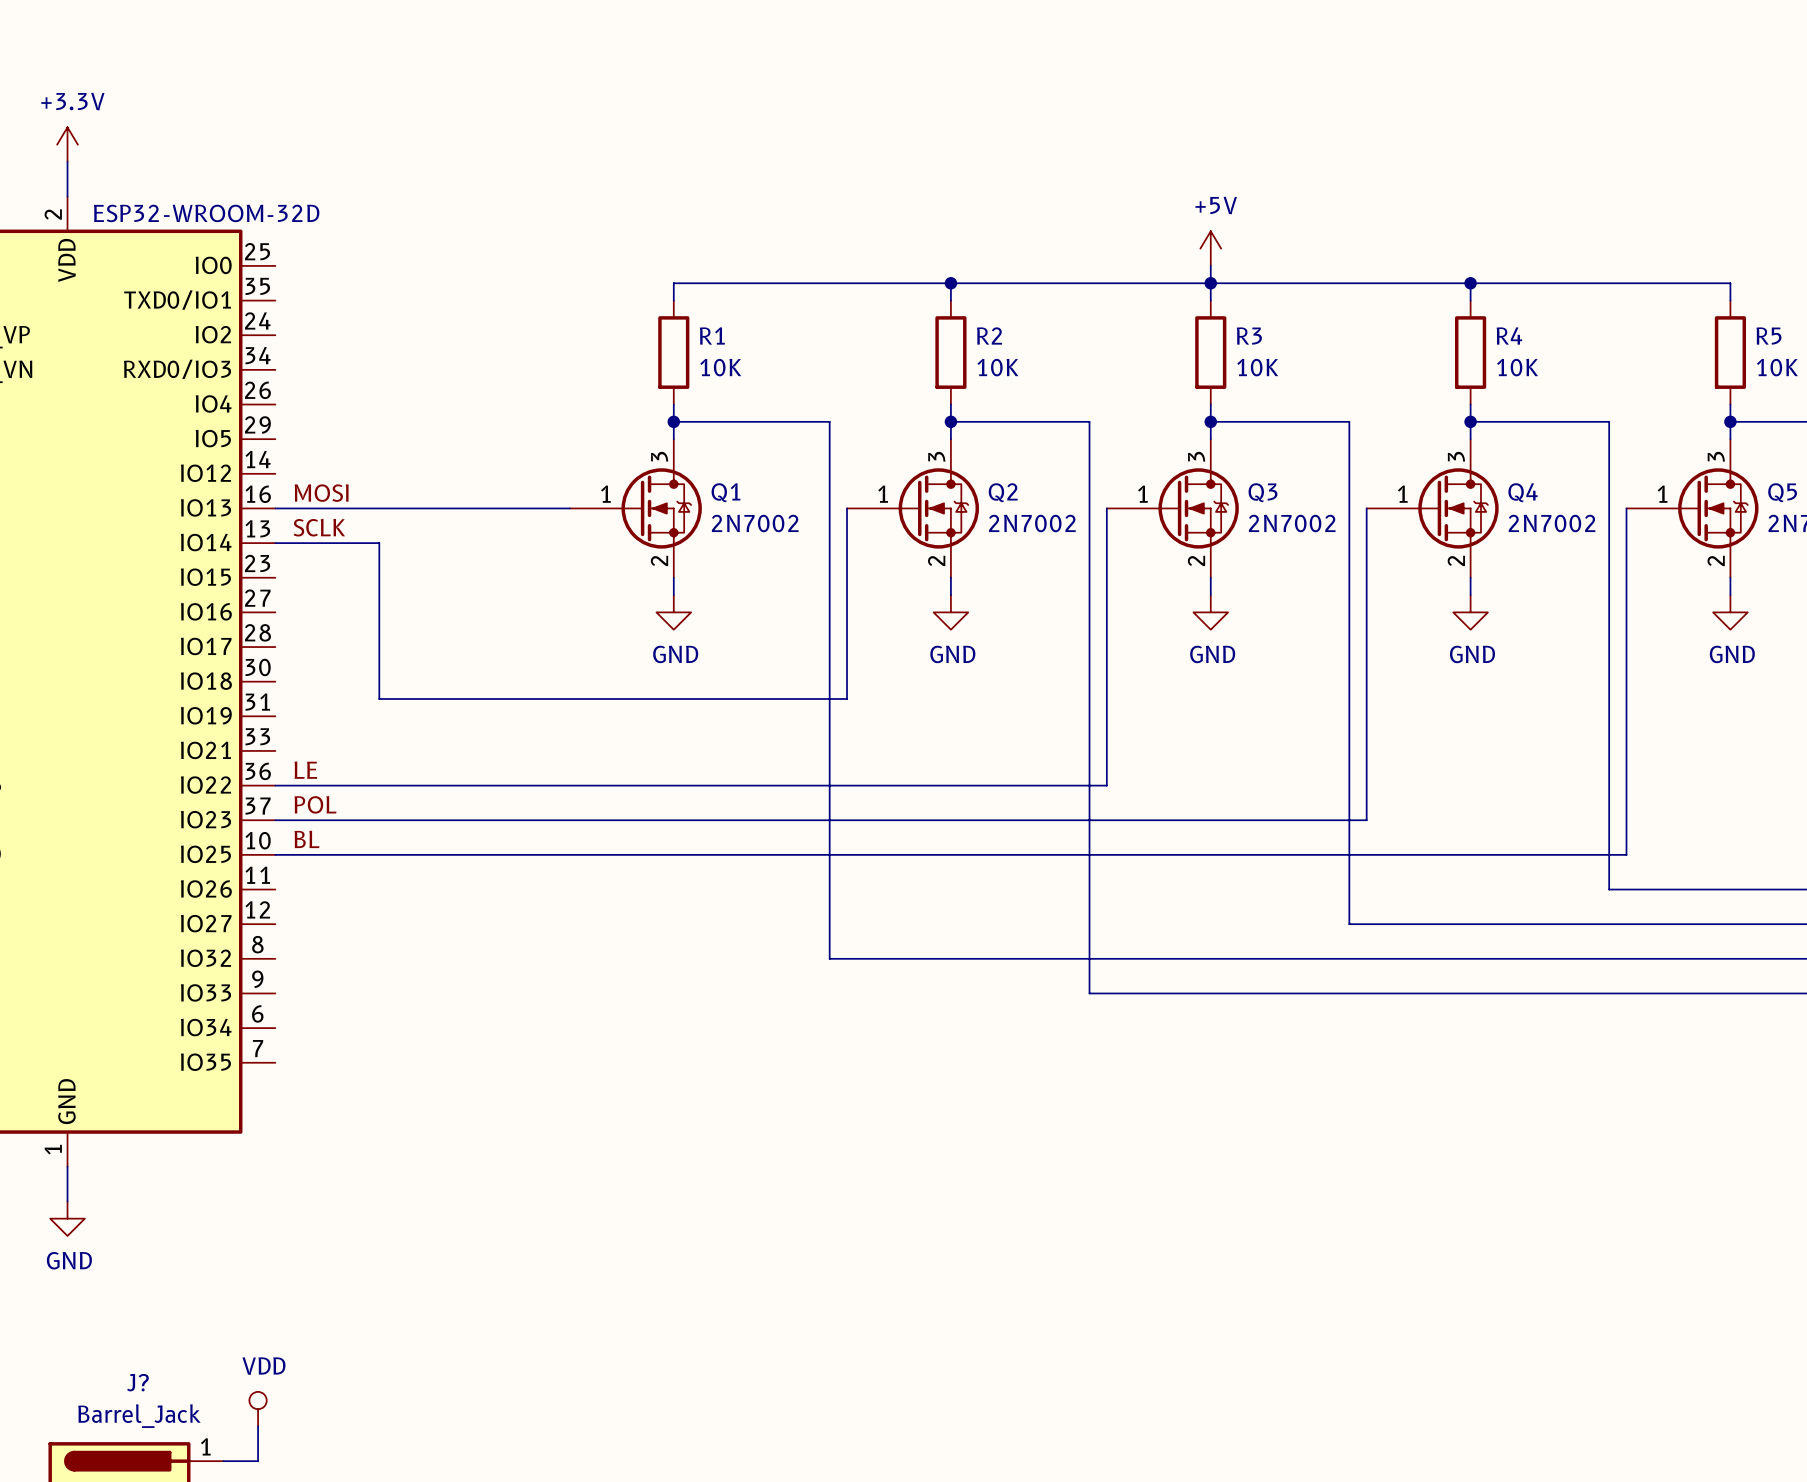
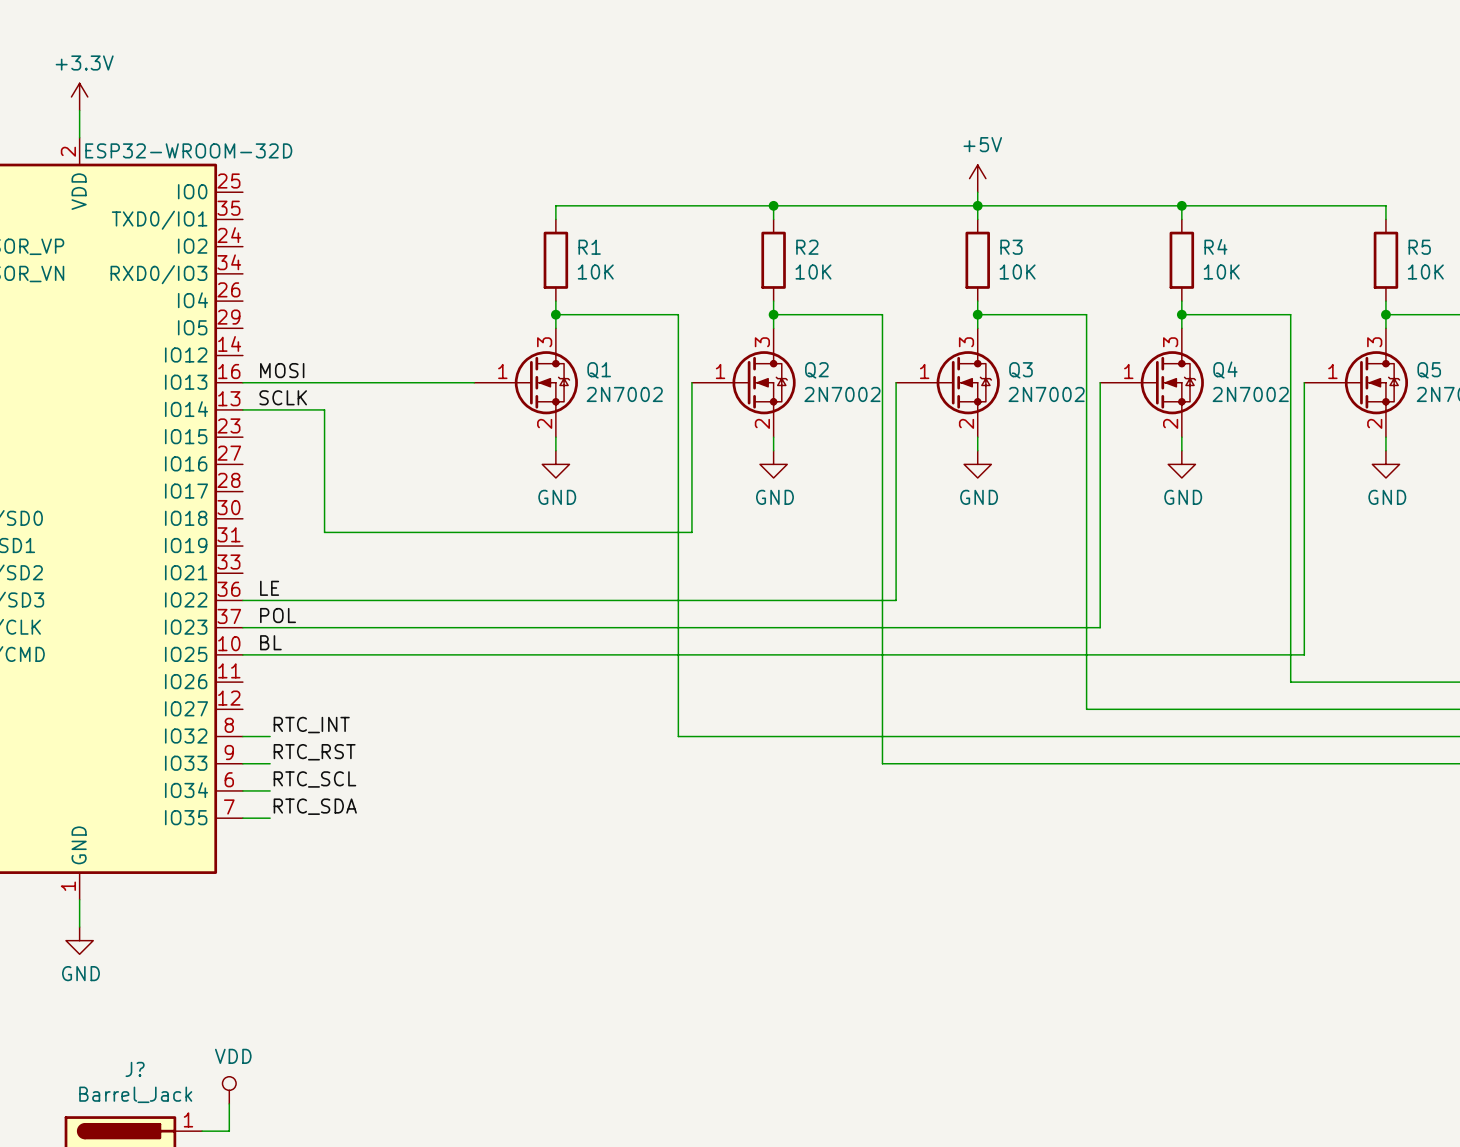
label: none -> RTC_INT (311, 725)
wire: none -> (242, 736) (270, 736)
label: none -> RTC_RST (314, 752)
wire: none -> (242, 763) (270, 763)
label: none -> RTC_SCL (314, 779)
wire: none -> (242, 790) (270, 790)
label: none -> RTC_SDA (315, 806)
wire: none -> (242, 818) (270, 818)

